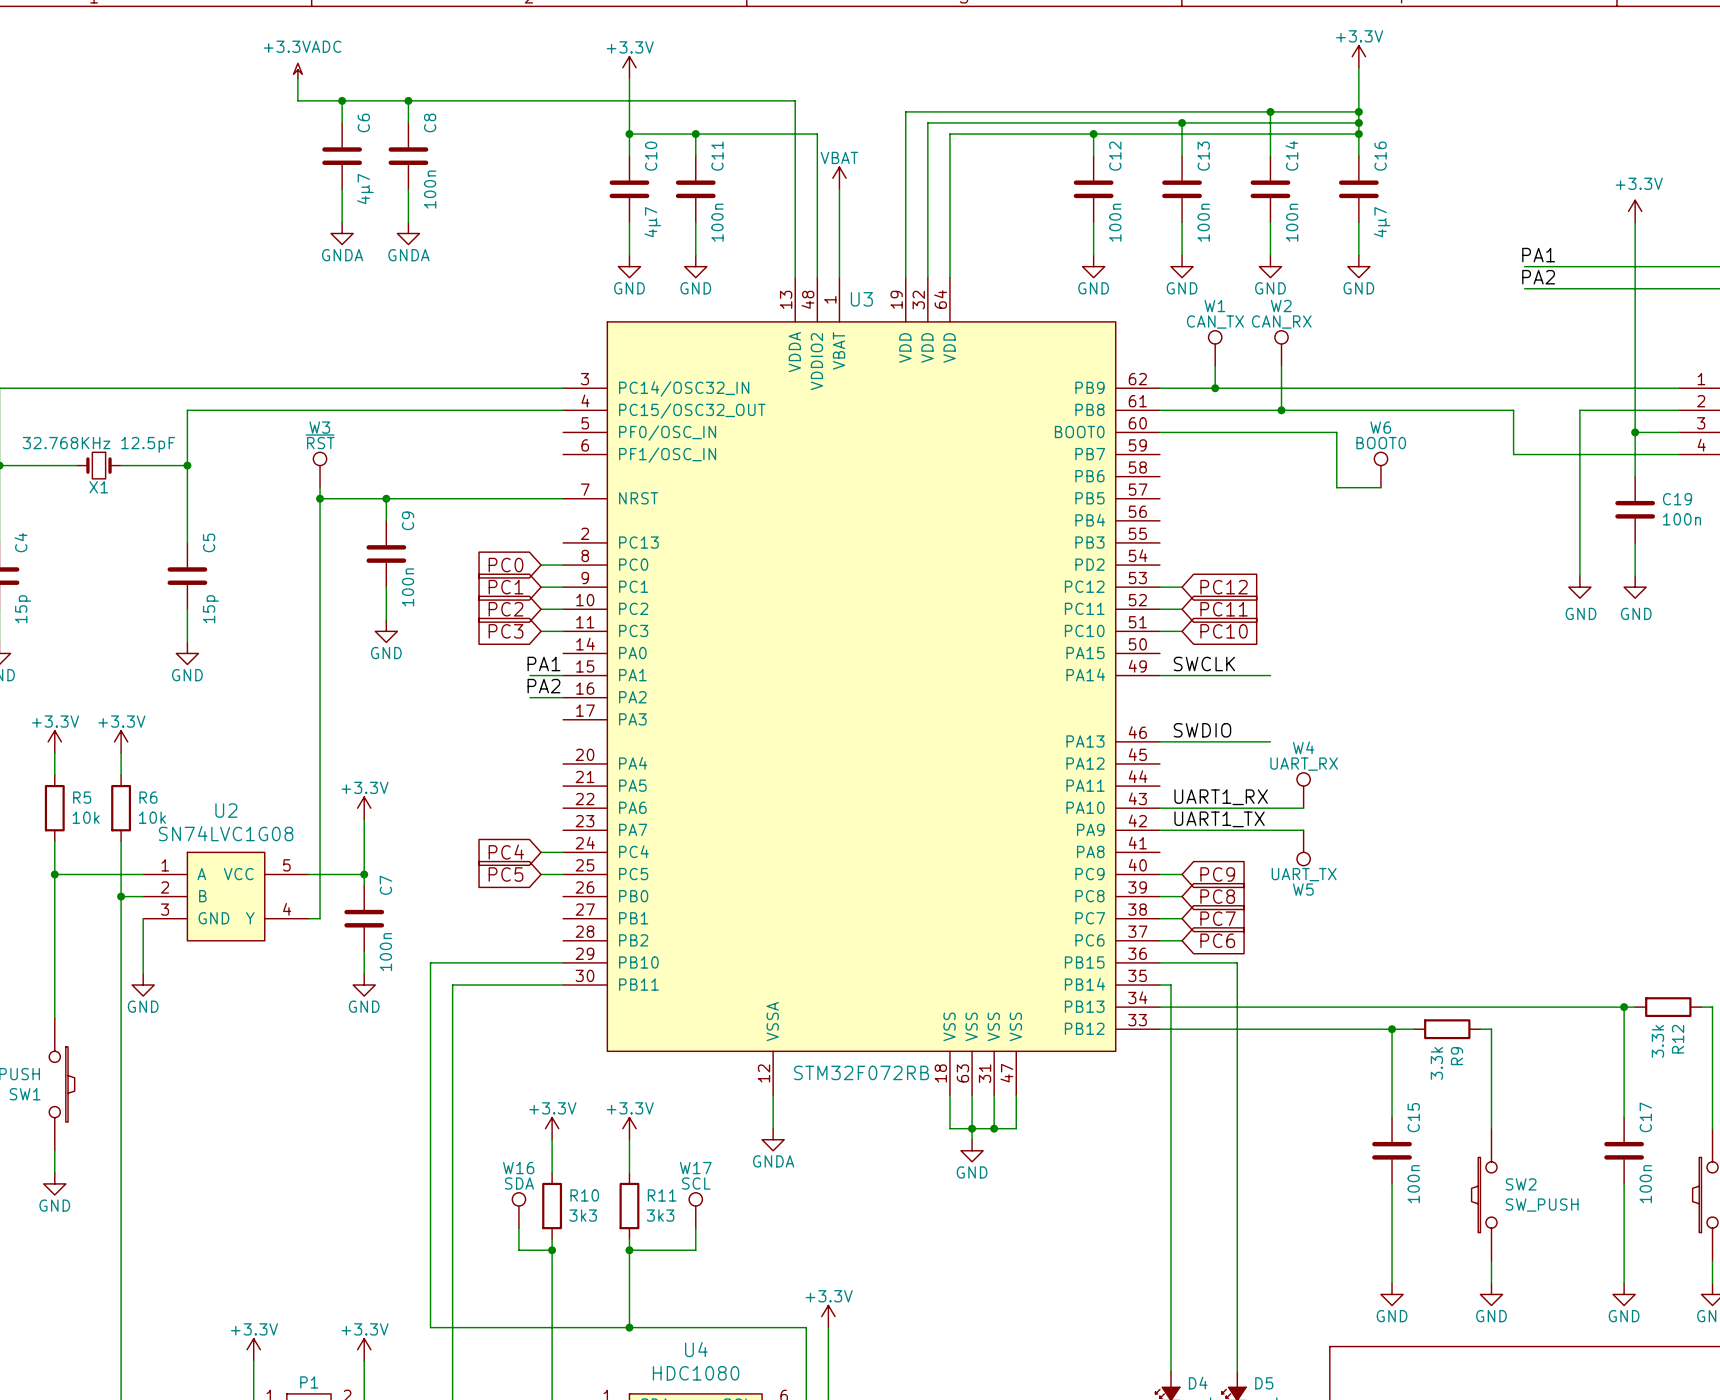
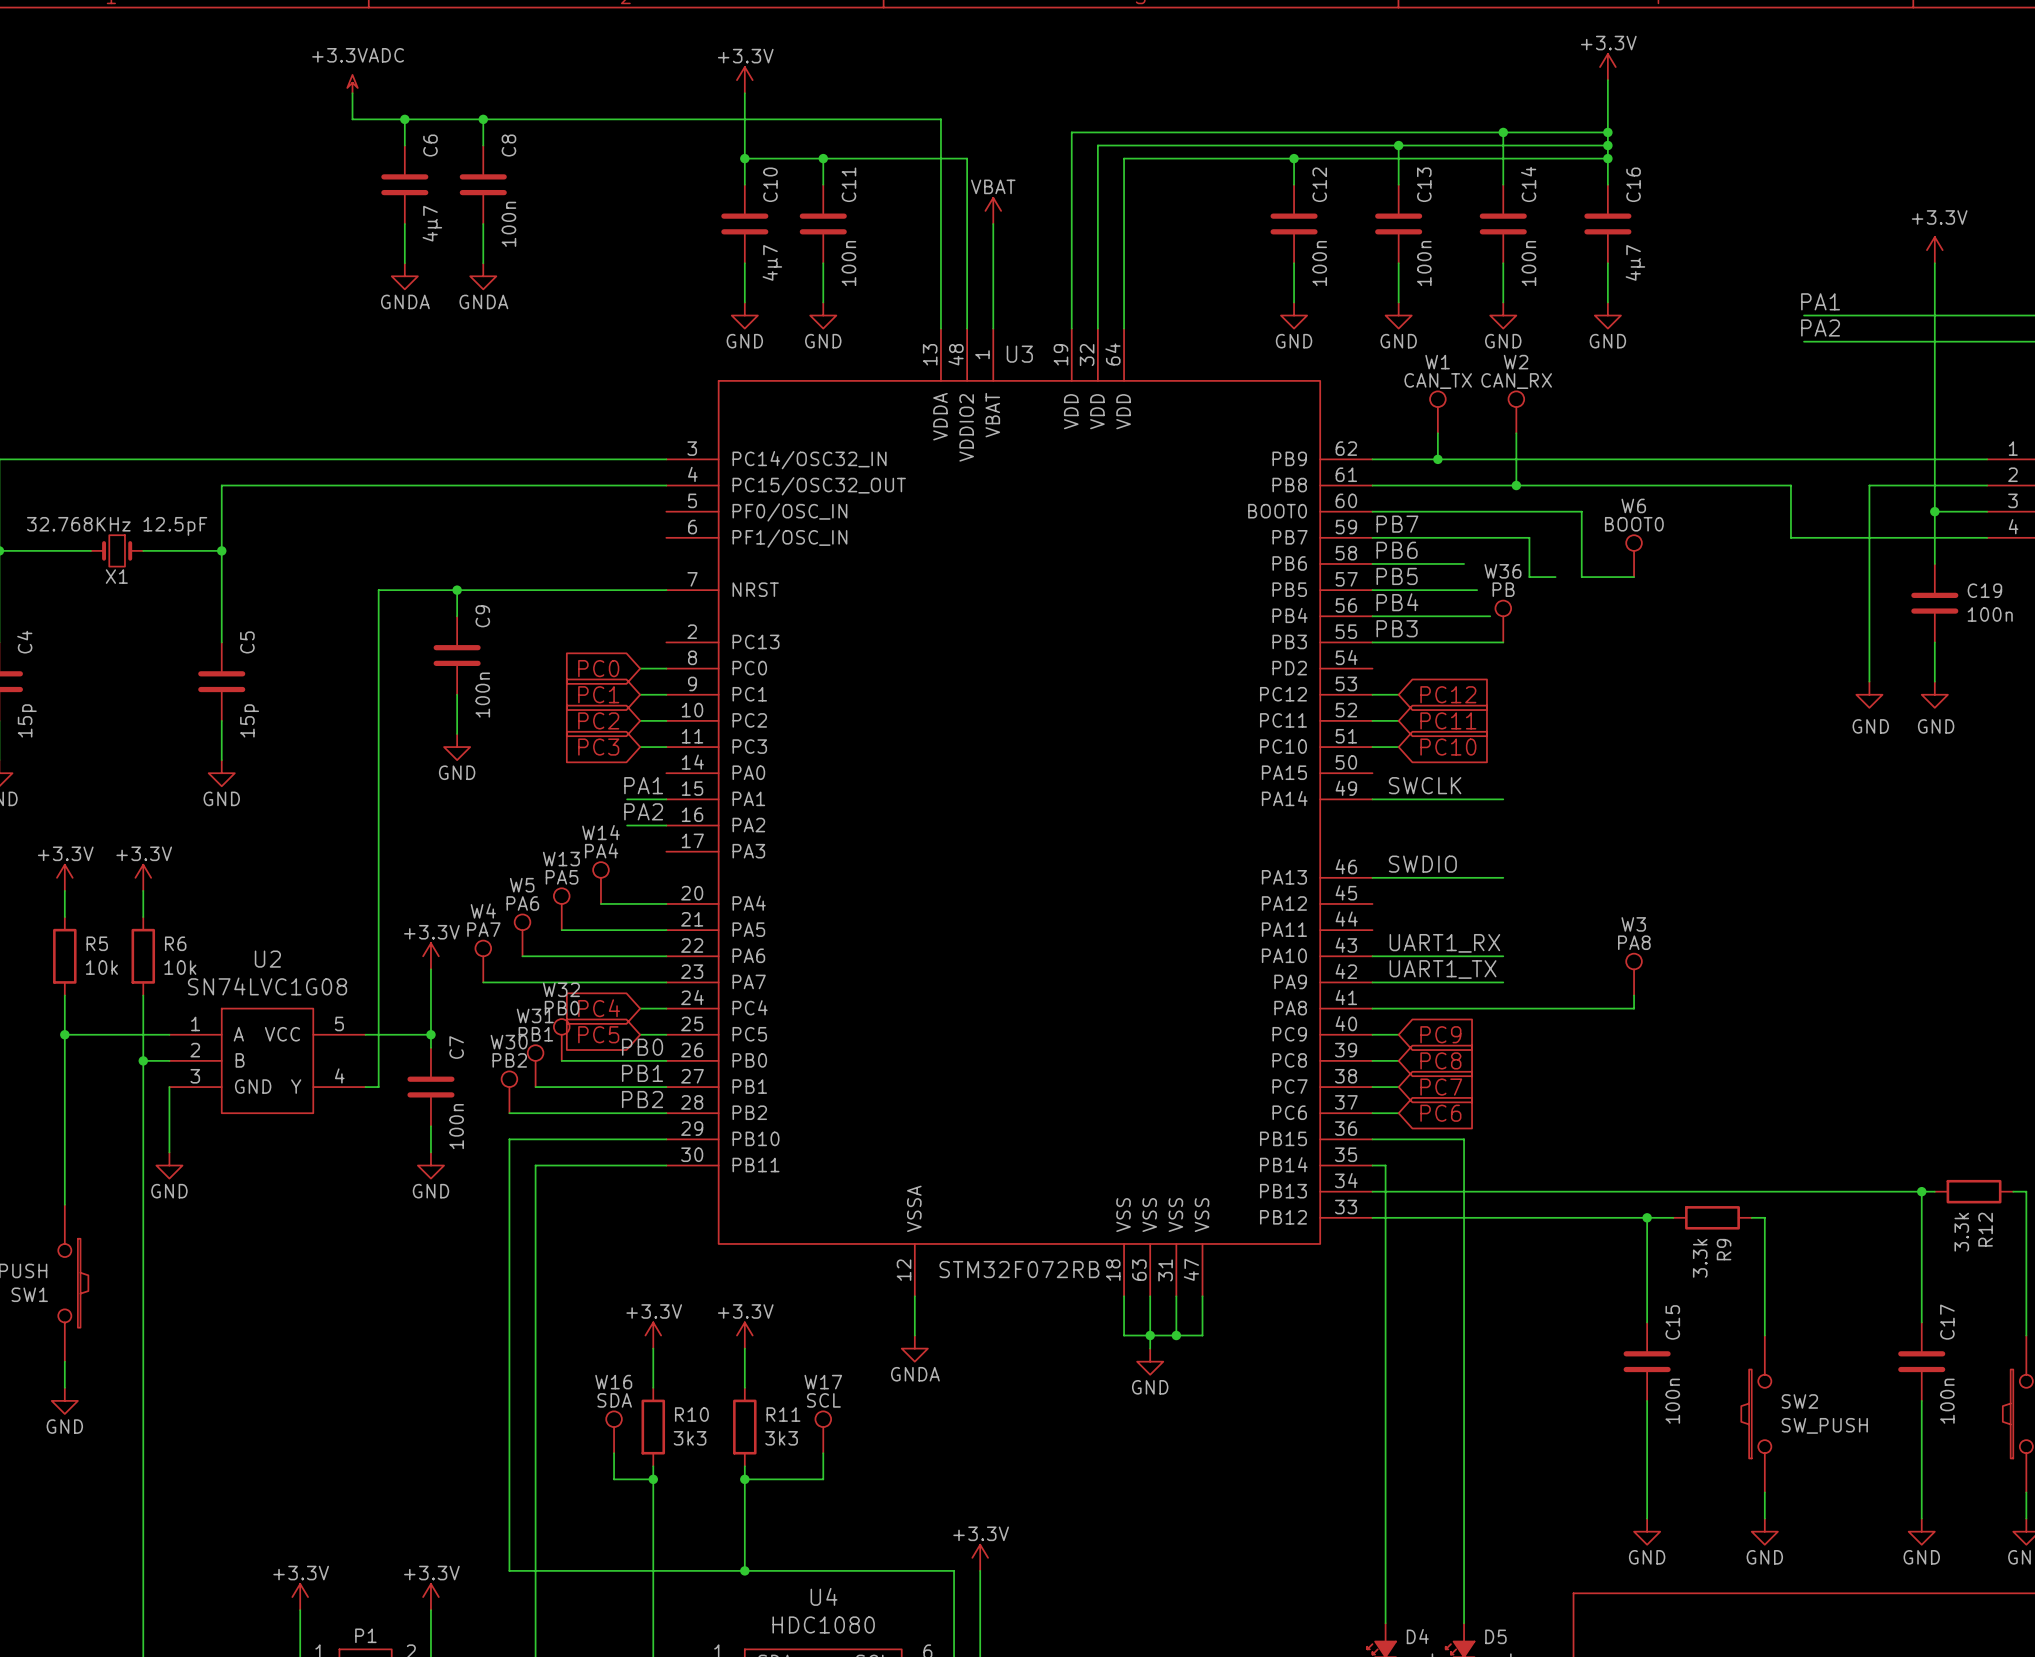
W3 value: ~{RST} (320, 441) -> PA8 (1634, 942)
label: none -> PB7 (1397, 524)
wire: none -> (1372, 537) (1529, 537) (1529, 577) (1555, 577)
label: none -> PB6 (1397, 550)
W3 position: (320, 470) -> (1634, 974)
wire: none -> (1372, 563) (1464, 563)
wire: (320, 487) (320, 498) -> none
label: none -> PB5 (1397, 576)
junction: (320, 498) -> none
wire: none -> (1372, 590) (1477, 590)
label: none -> PB4 (1397, 602)
wire: none -> (1372, 616) (1490, 616)
W36: none -> PB (1503, 621)
label: none -> PB3 (1397, 628)
wire: none -> (1372, 642) (1503, 642)
W14: none -> PA4 (600, 883)
wire: none -> (600, 903) (666, 903)
W4 value: UART_RX (1304, 764) -> PA7 (483, 929)
W13: none -> PA5 (561, 909)
wire: none -> (561, 930) (666, 930)
W4 position: (1303, 790) -> (483, 961)
wire: none -> (522, 956) (666, 956)
wire: (1270, 808) (1303, 808) -> none
wire: none -> (483, 982) (666, 982)
wire: (1270, 830) (1303, 830) -> none
wire: none -> (1634, 995) (1634, 1008) (1372, 1008)
W5 position: (1303, 847) -> (522, 935)
W5 rotation: 0° (1303, 859) -> 180° (522, 922)
W5 value: UART_TX (1304, 874) -> PA6 (522, 903)
W32: none -> PB0 (561, 1039)
label: none -> PB0 (642, 1047)
wire: none -> (561, 1060) (666, 1060)
W31: none -> PB1 (535, 1066)
label: none -> PB1 (642, 1073)
wire: none -> (535, 1087) (666, 1087)
W30: none -> PB2 (509, 1092)
label: none -> PB2 (642, 1099)
wire: none -> (509, 1113) (666, 1113)

